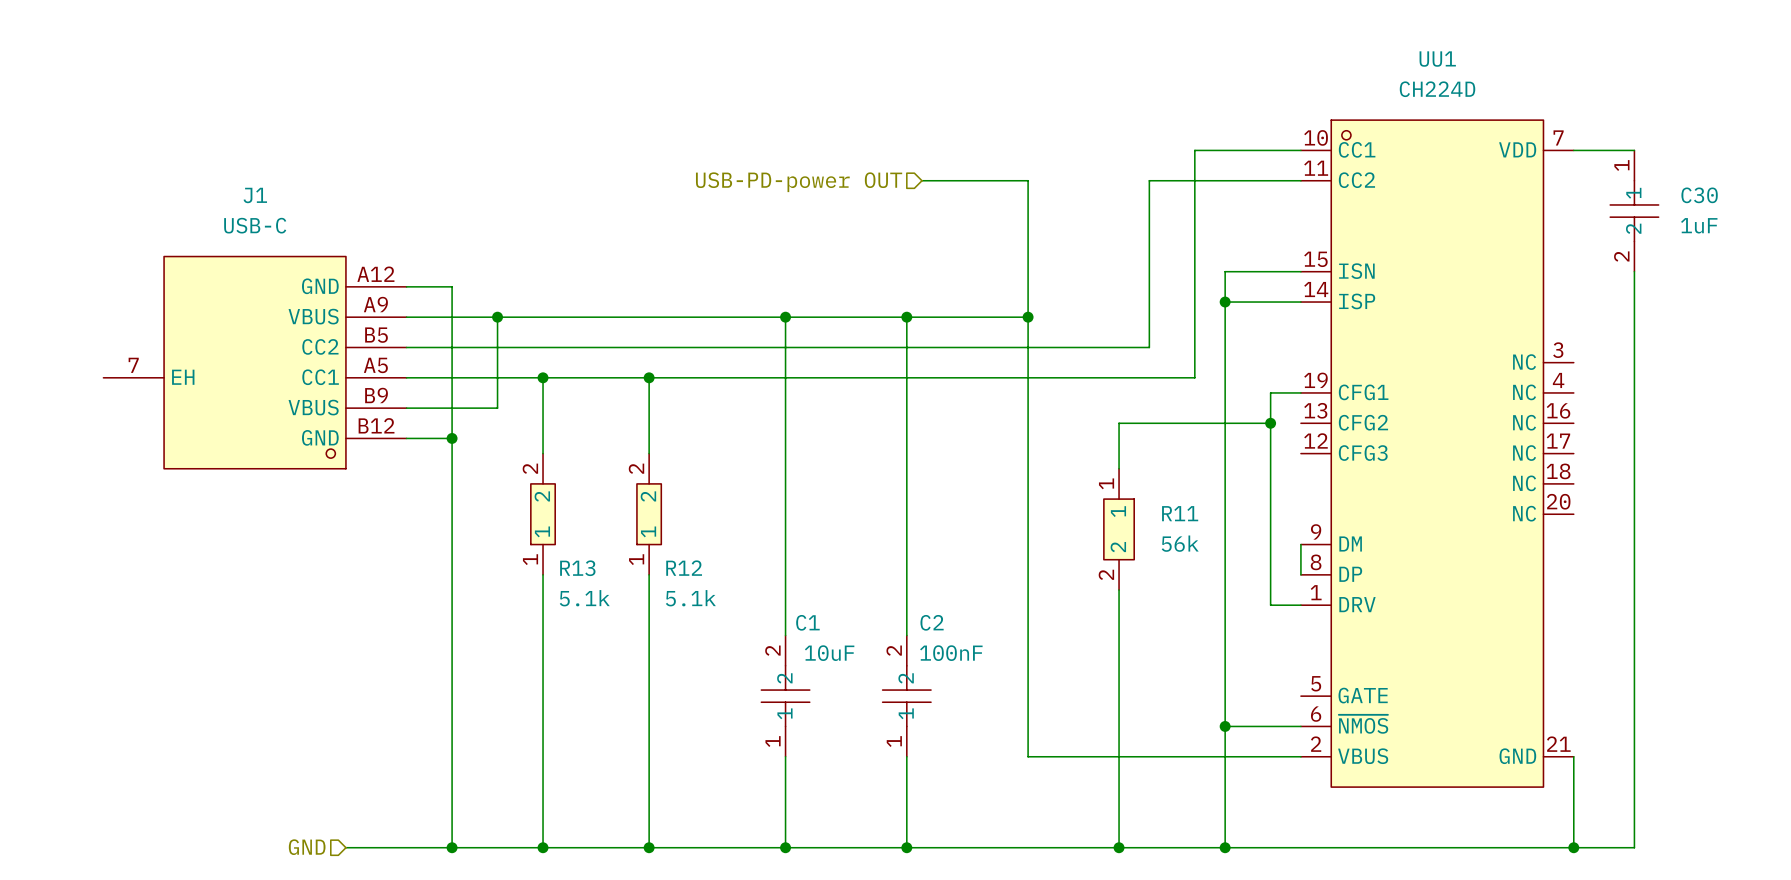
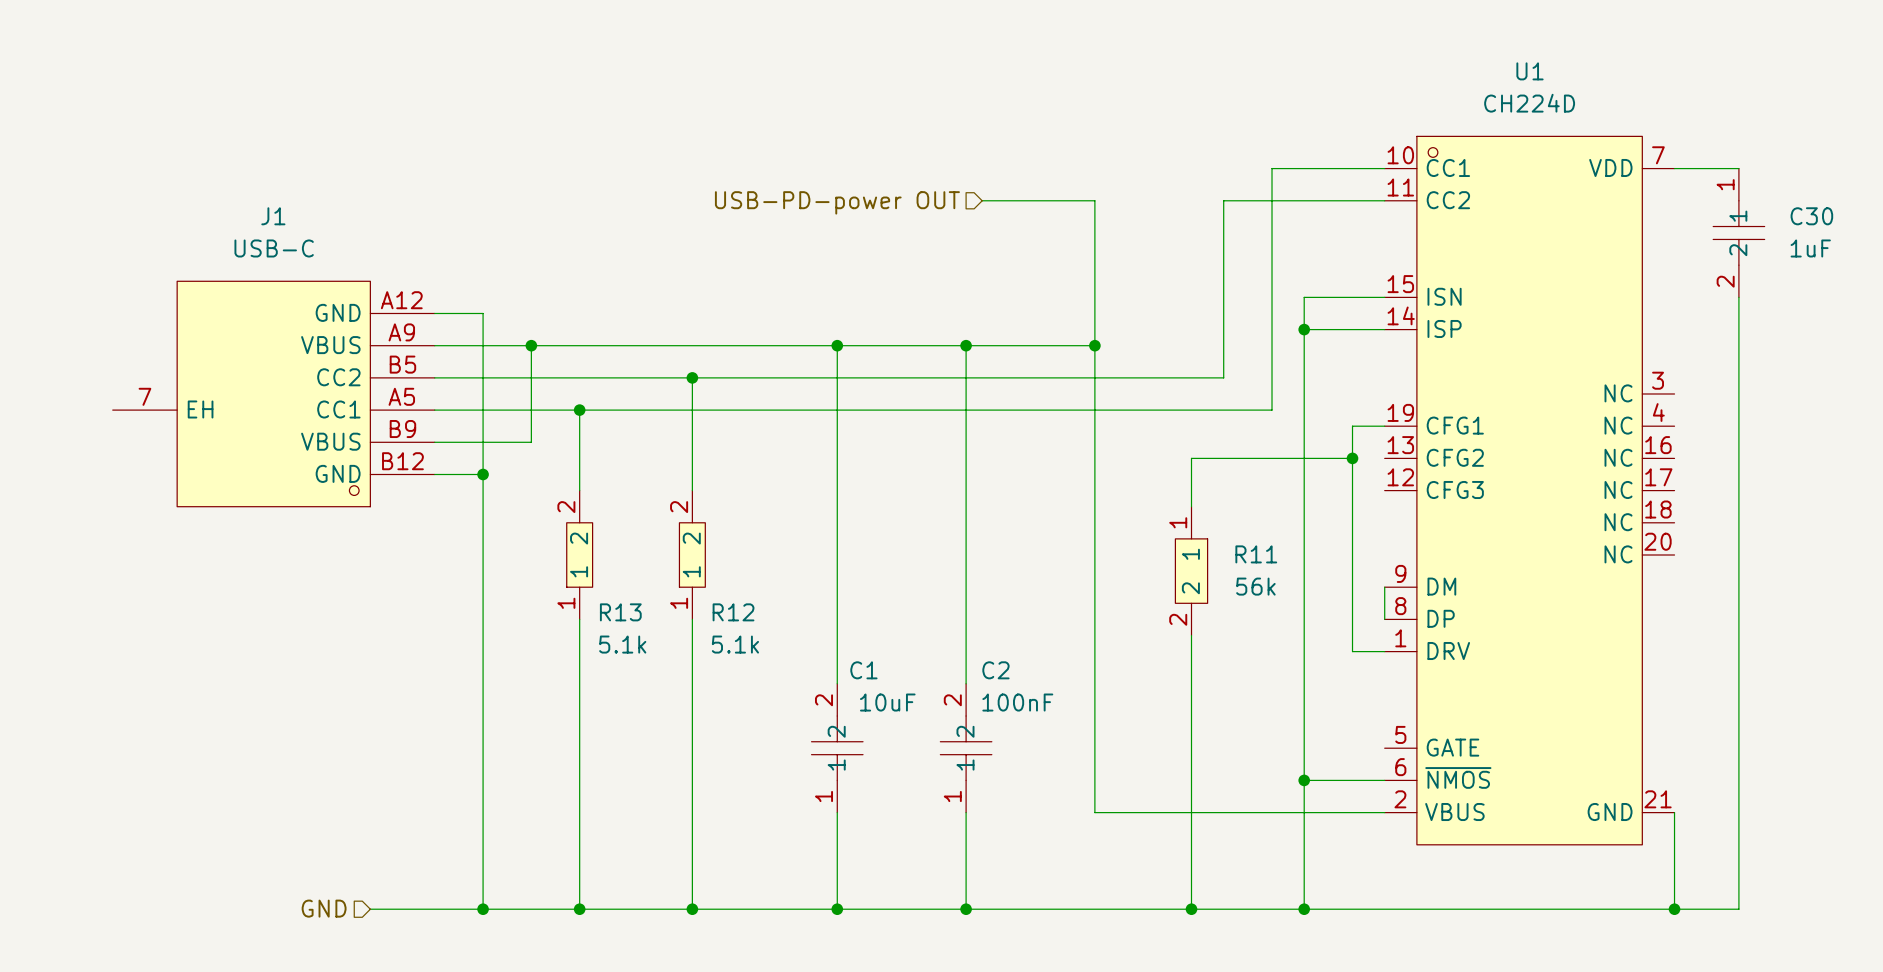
UU1 name: UU1 (1437, 59) -> U1 (1530, 71)
wire: none -> (692, 377) (692, 410)
junction position: (649, 377) -> (692, 377)

